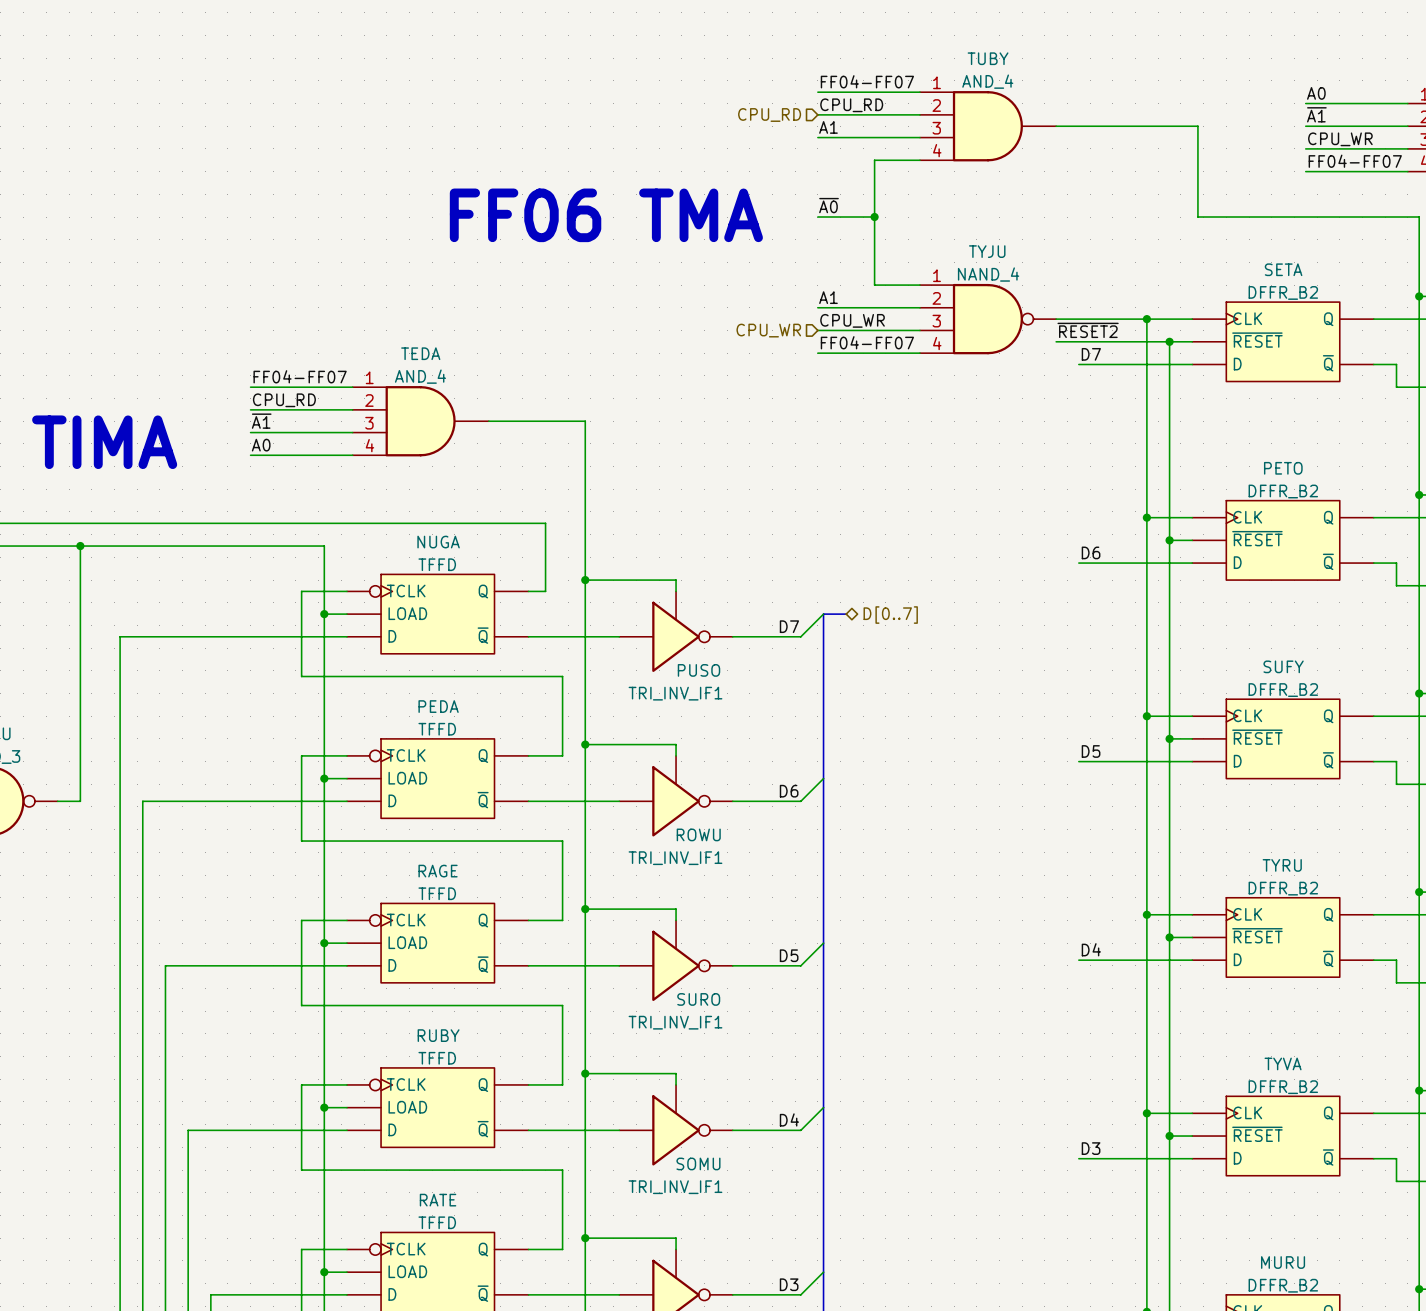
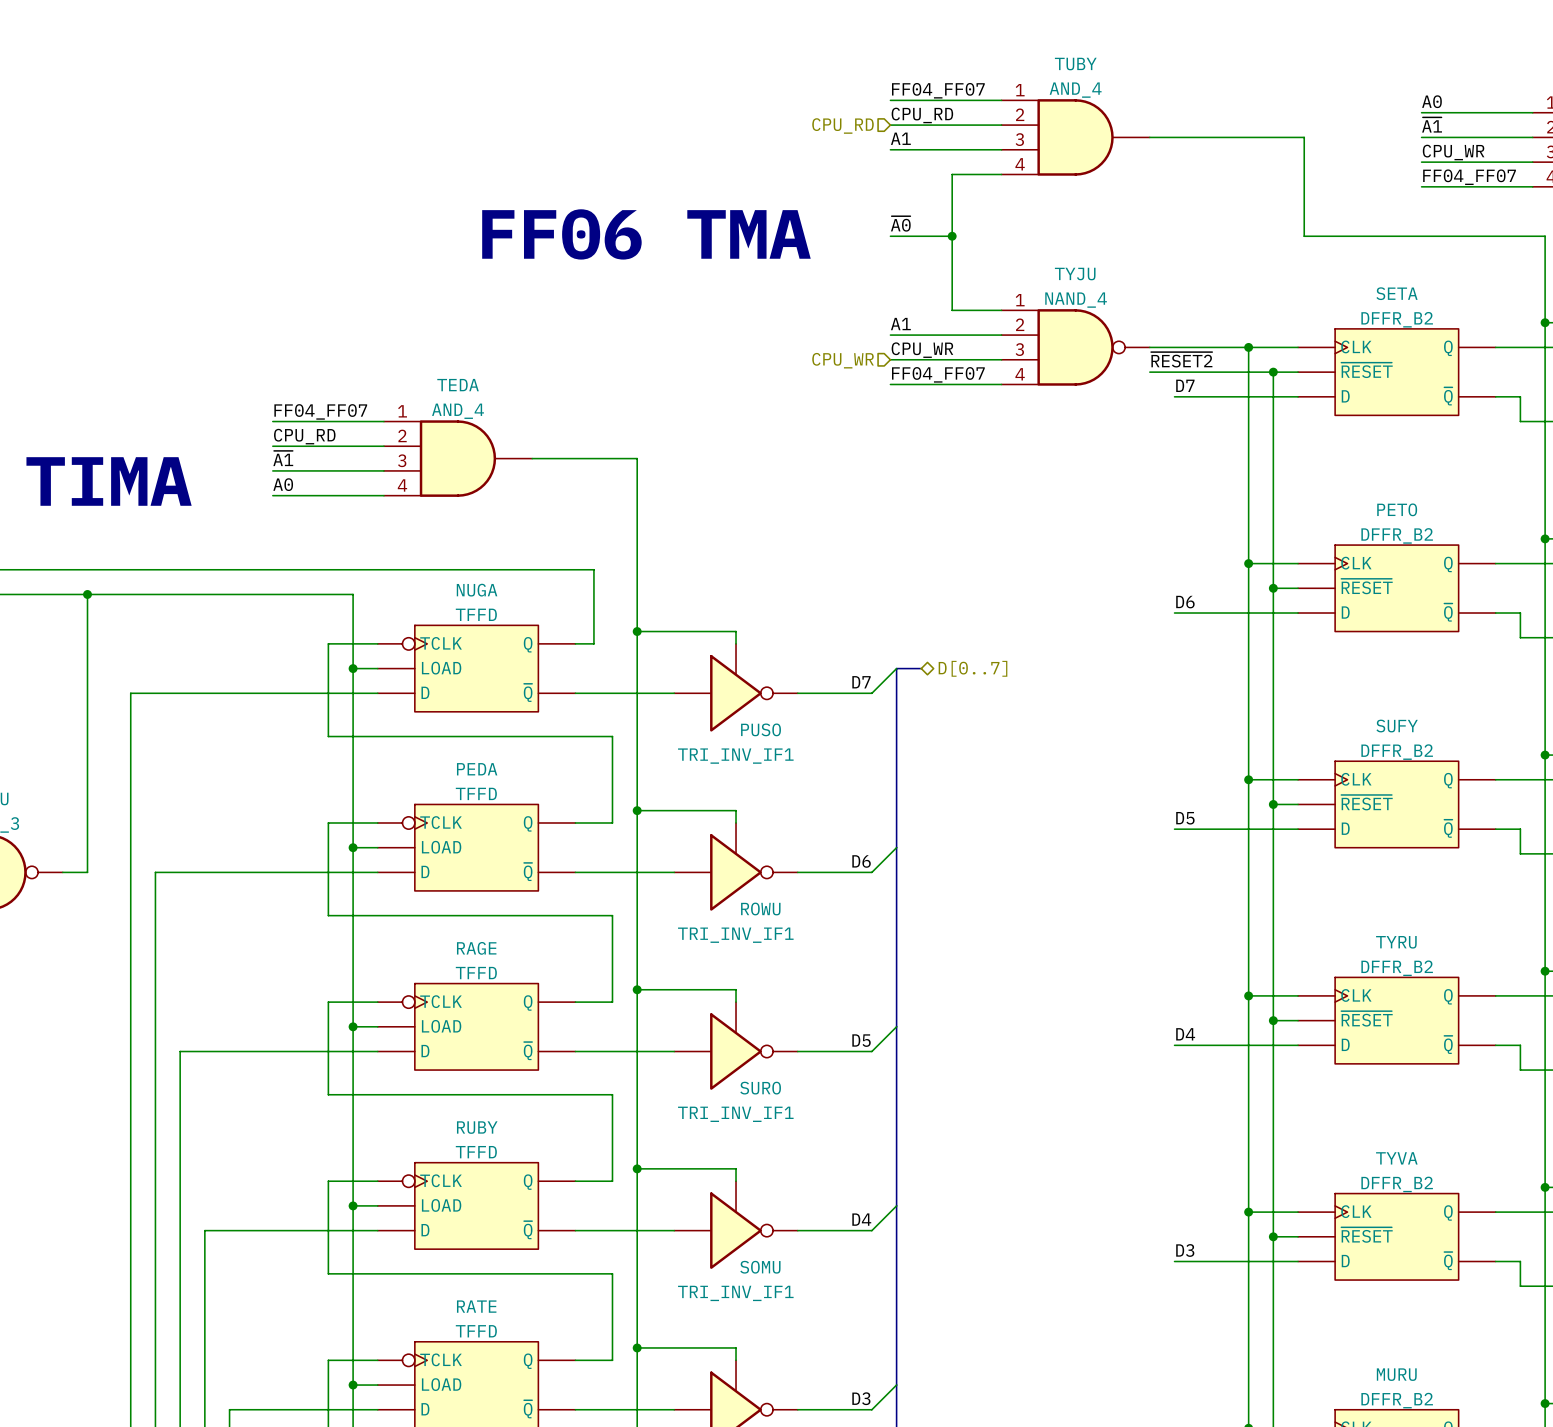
label: FF04-FF07 (867, 81) -> FF04_FF07 (938, 90)
label: FF04-FF07 (1355, 161) -> FF04_FF07 (1469, 177)
label: FF04-FF07 (867, 342) -> FF04_FF07 (938, 374)
label: FF04-FF07 (300, 376) -> FF04_FF07 (320, 411)

